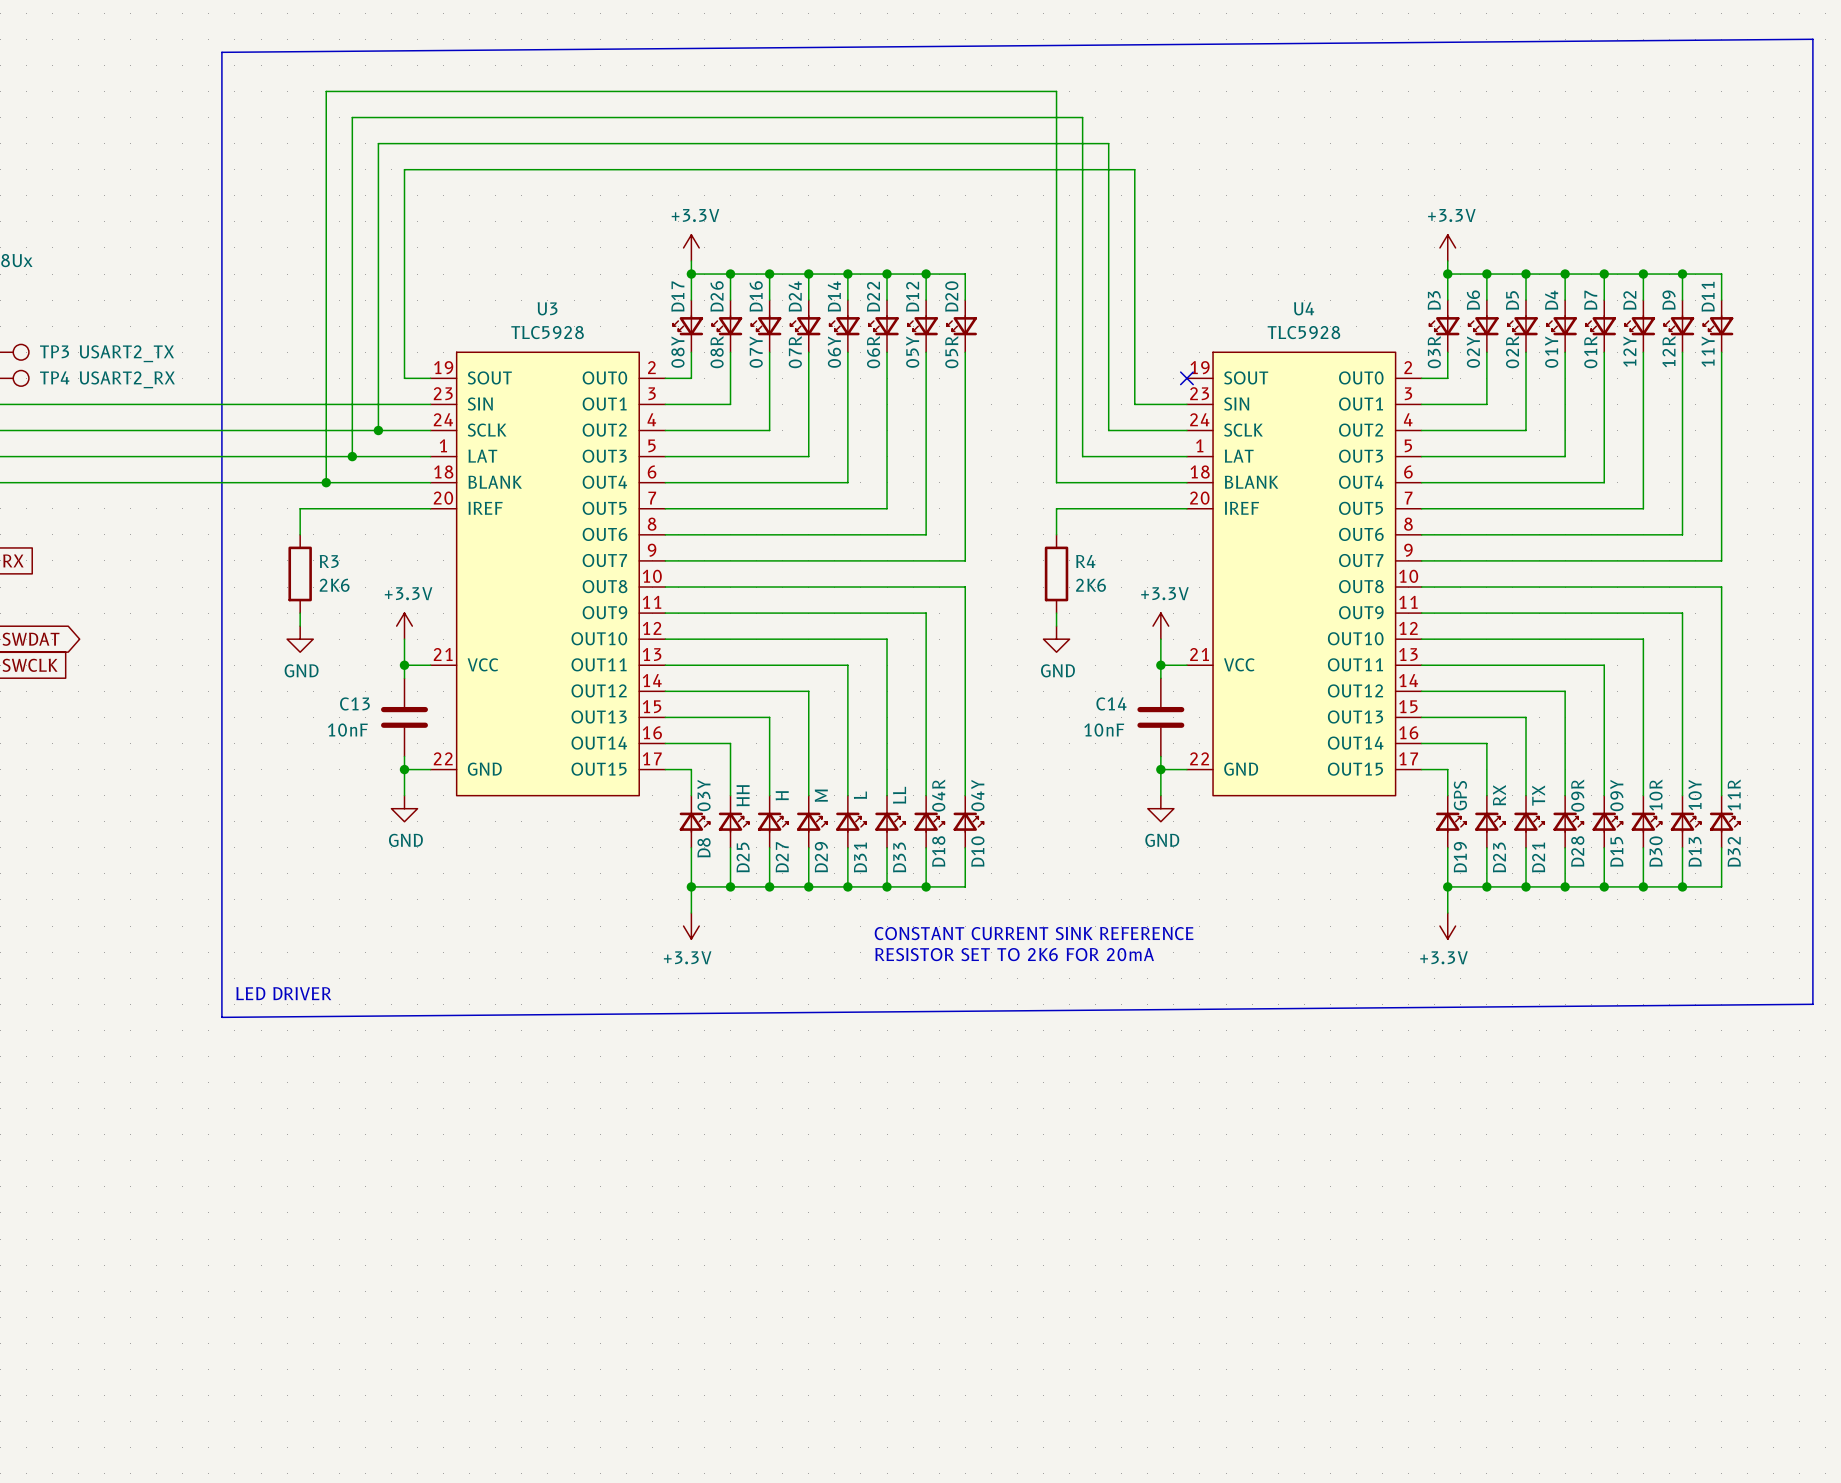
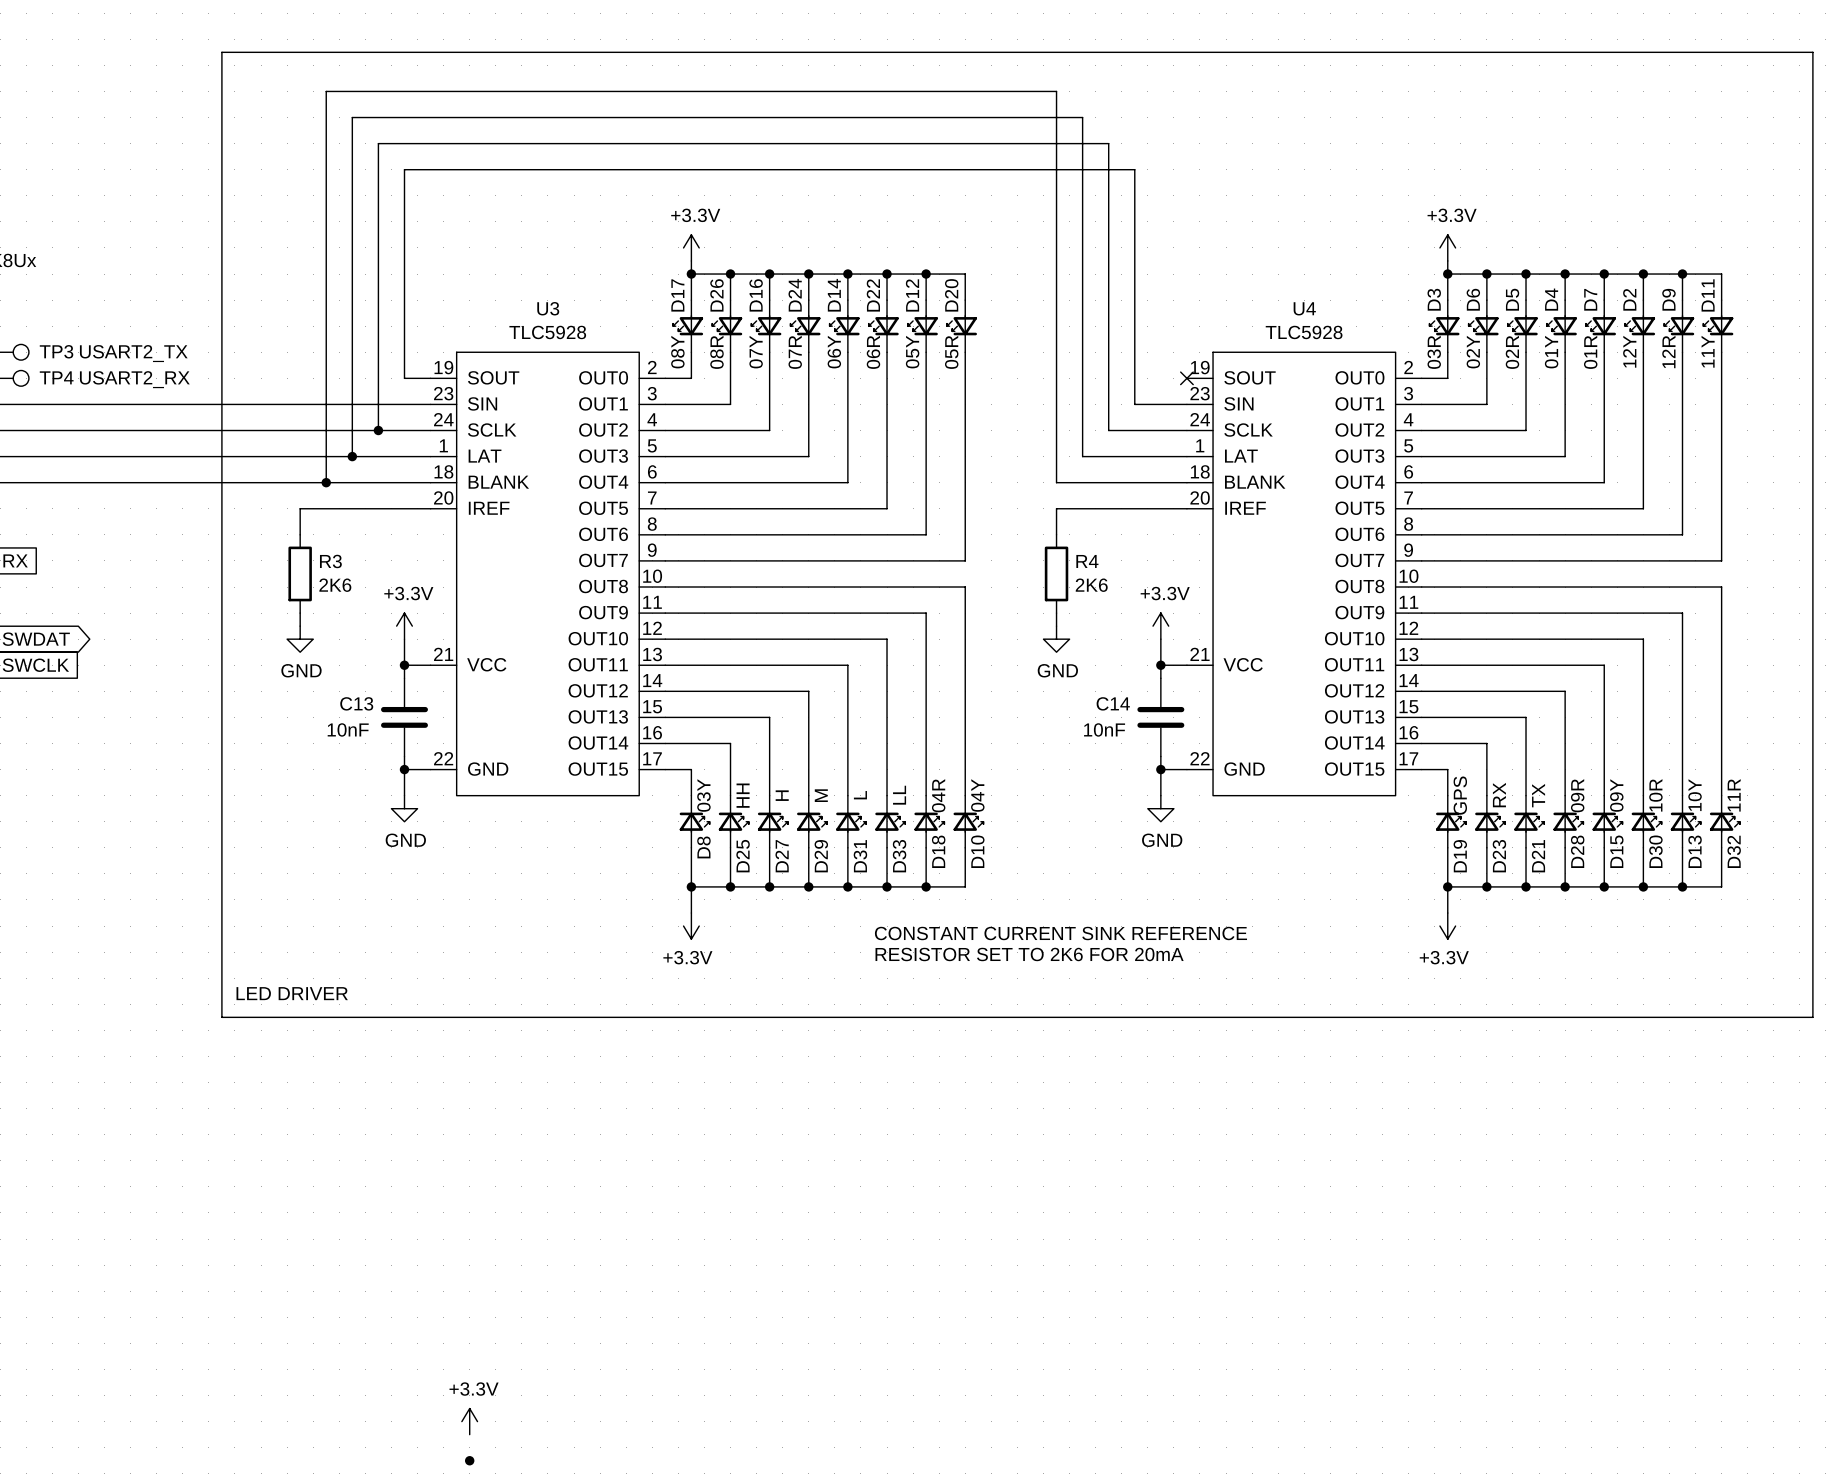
line: (221, 52) (1812, 39) (1812, 52) -> (221, 52) (1812, 52)
line: (1812, 1004) (221, 1017) -> (1812, 1004) (1812, 1017) (221, 1017)
power symbol: none -> +3.3V (469, 1421)
junction: none -> (469, 1460)

